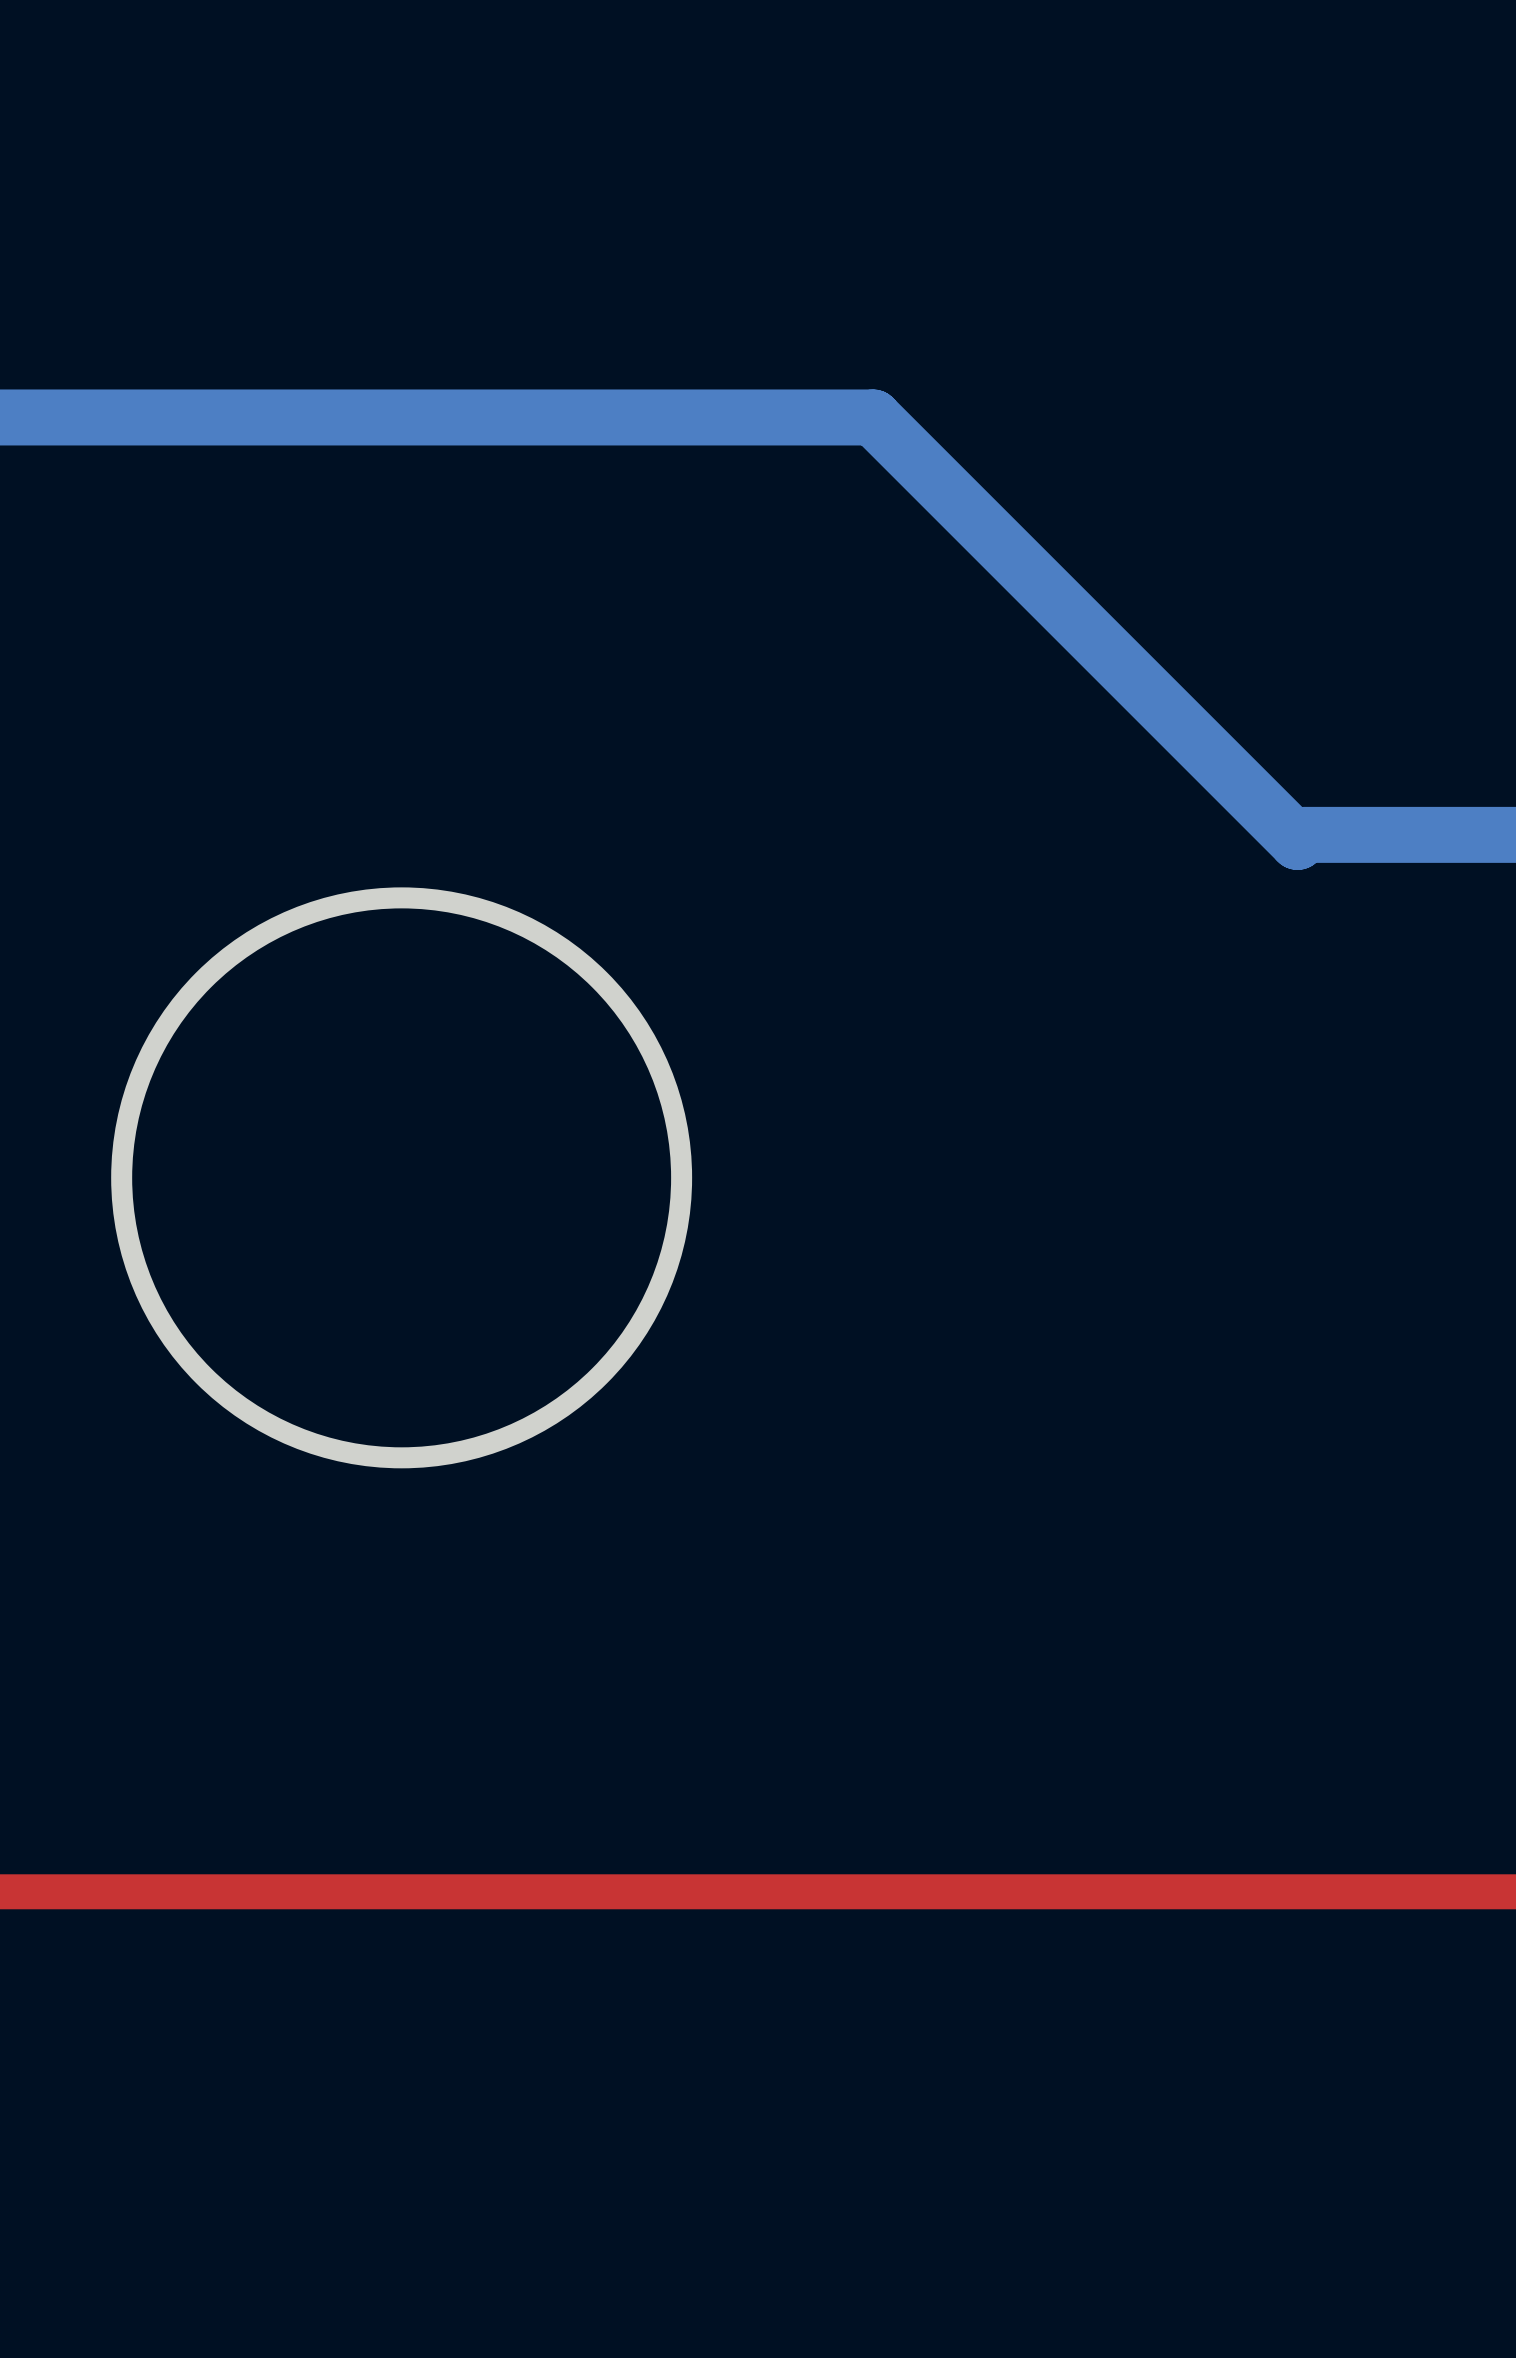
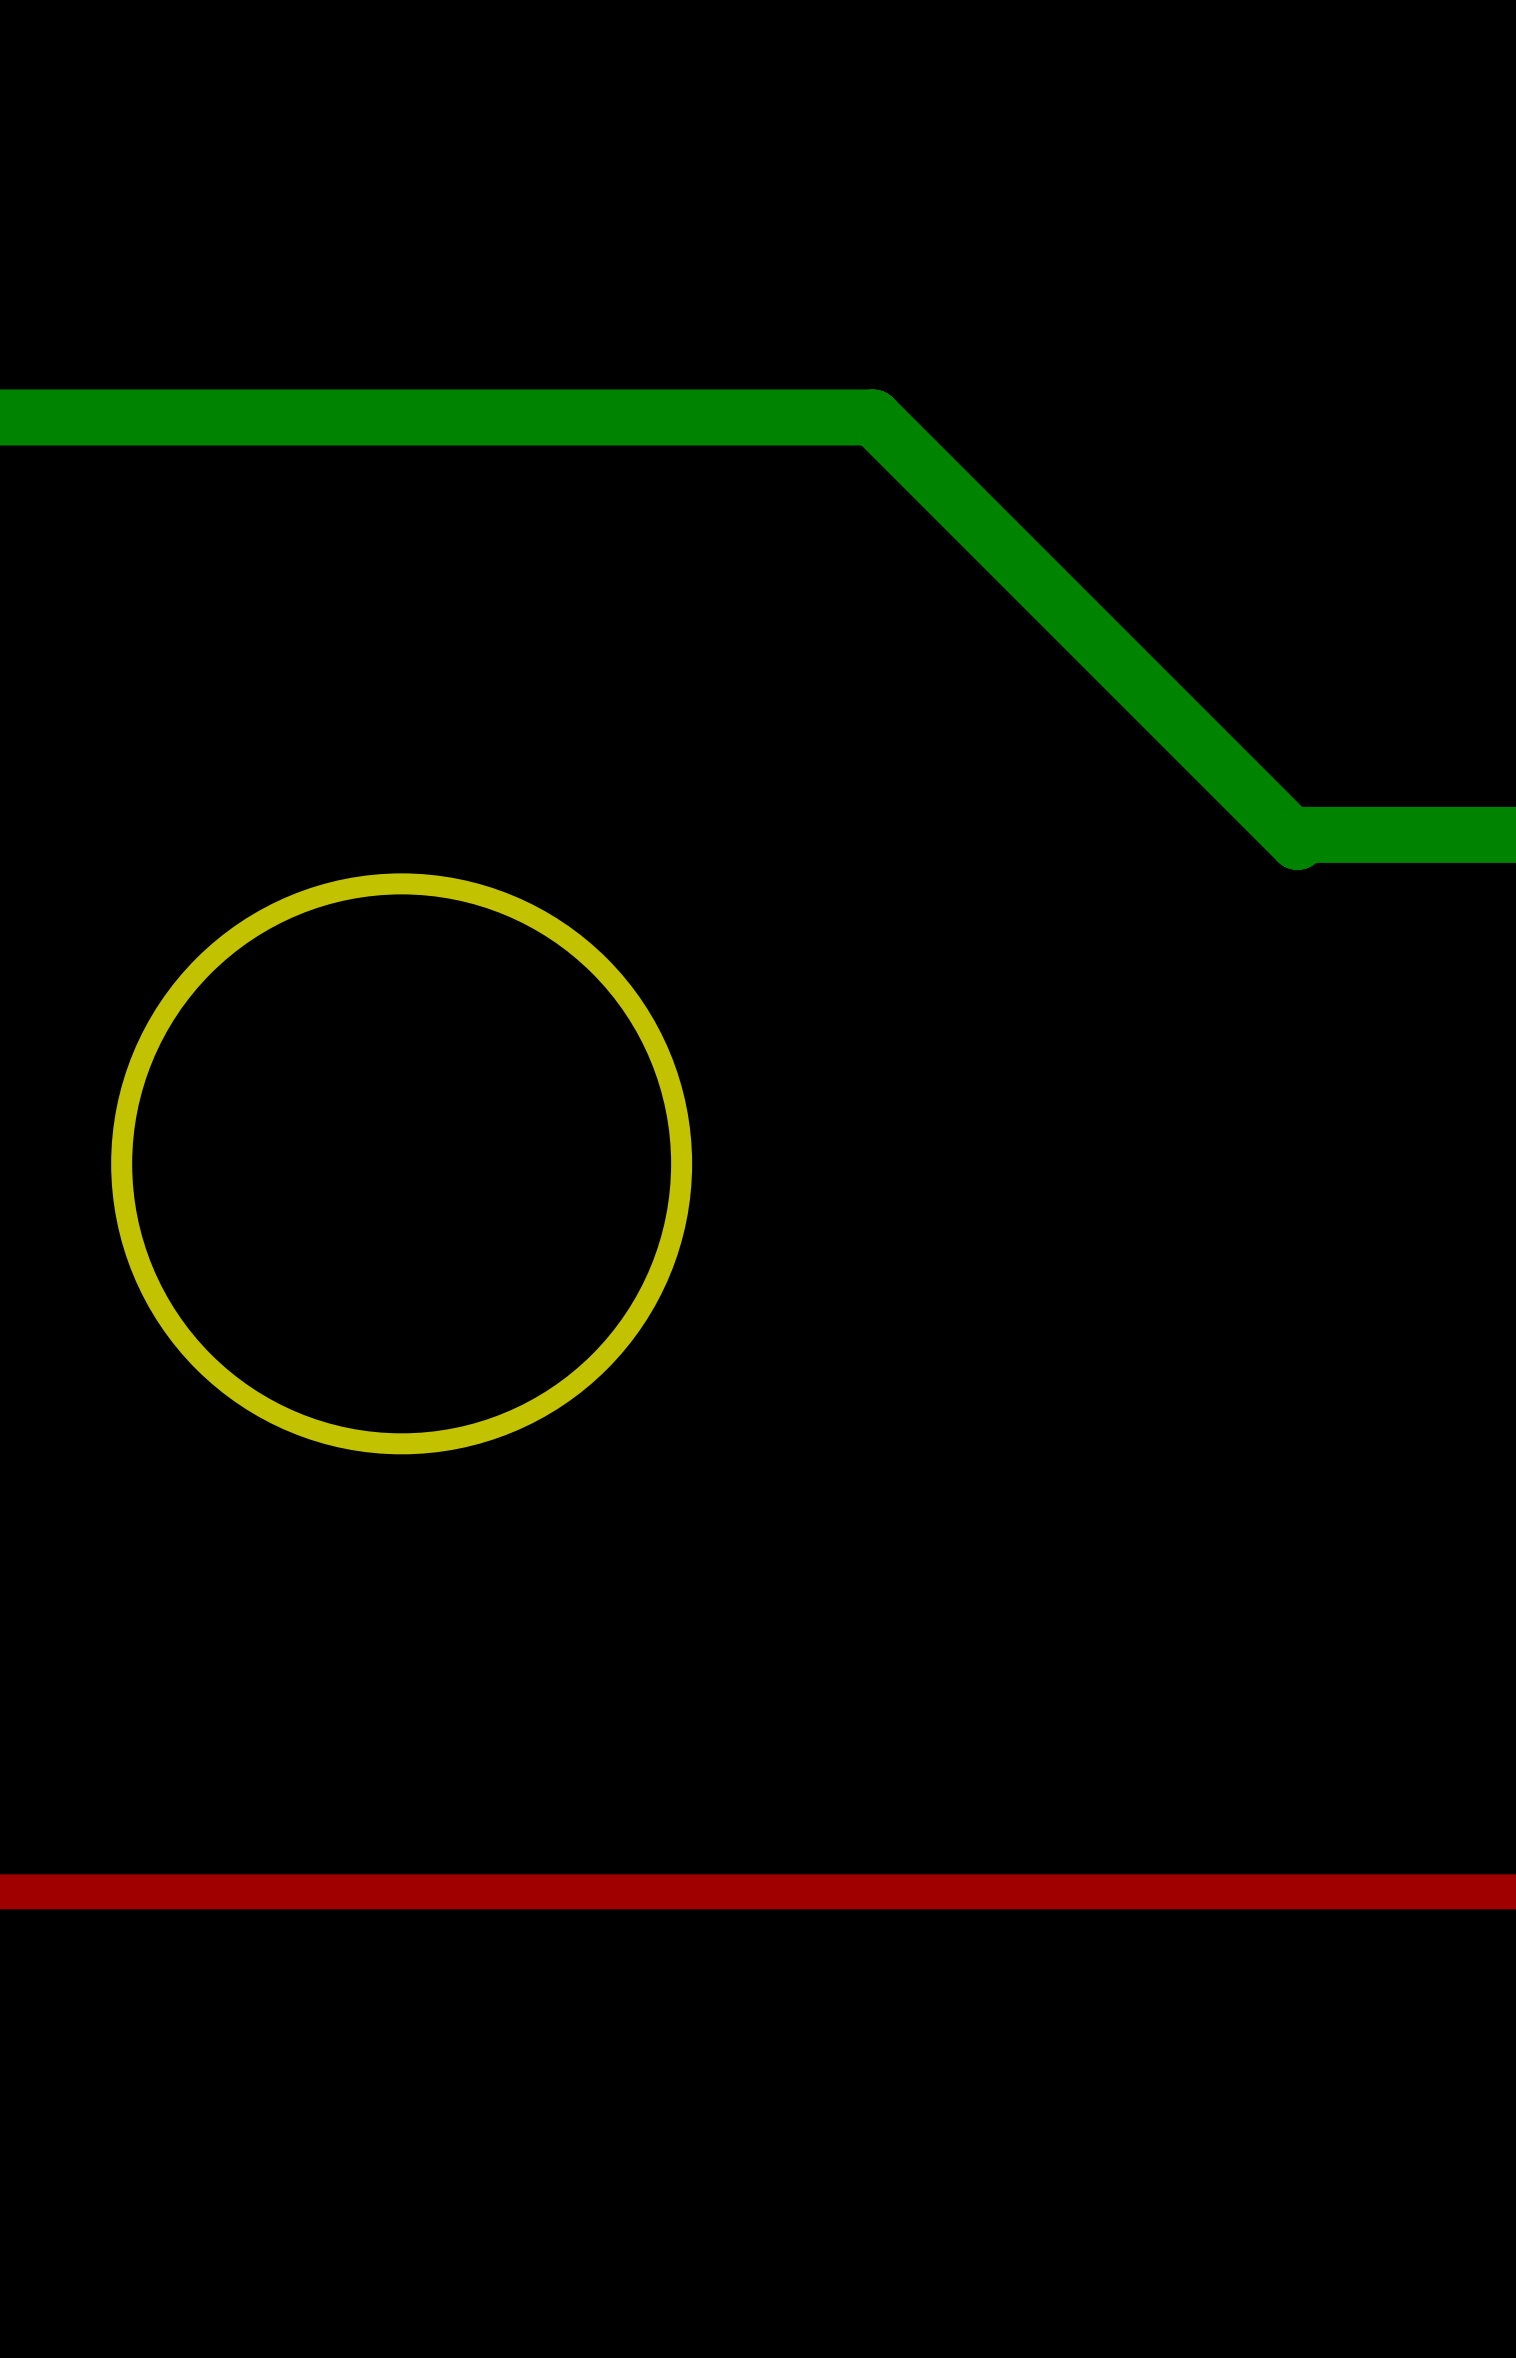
round board edge position: (401, 1177) -> (401, 1163)

